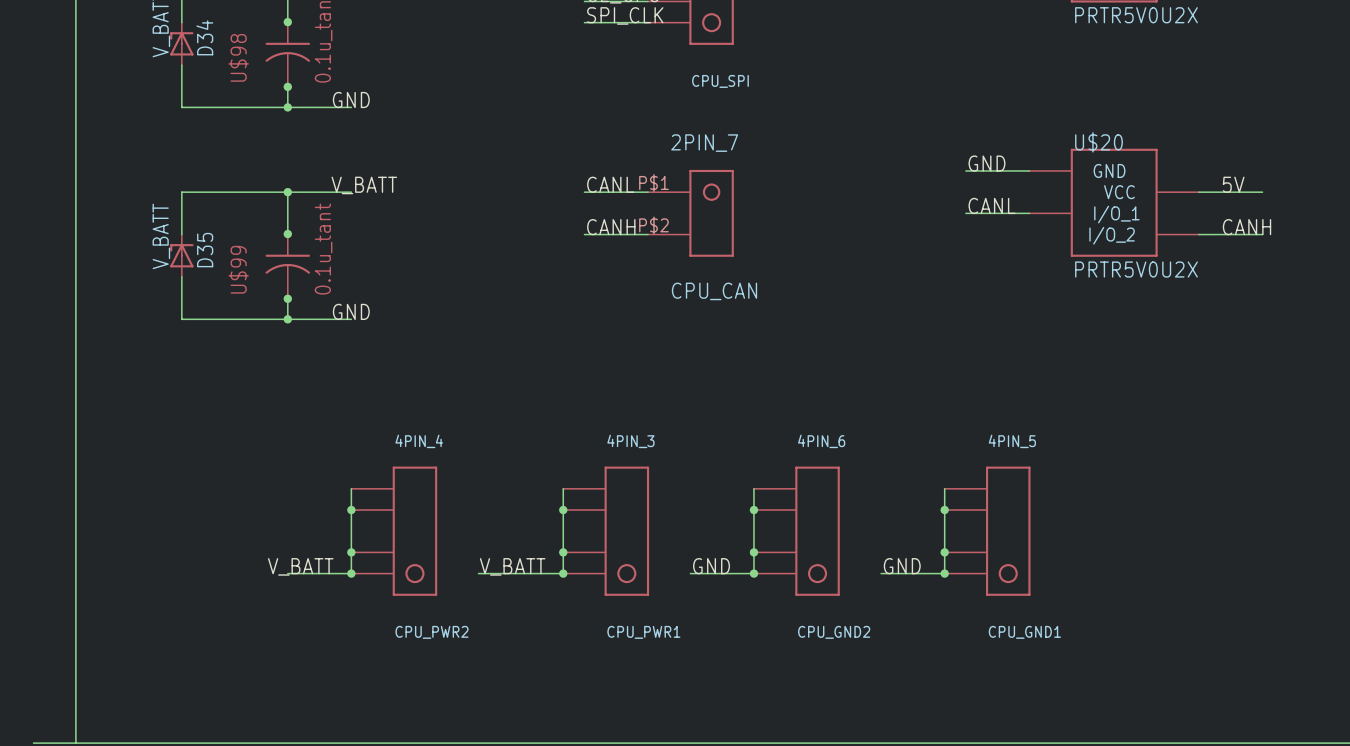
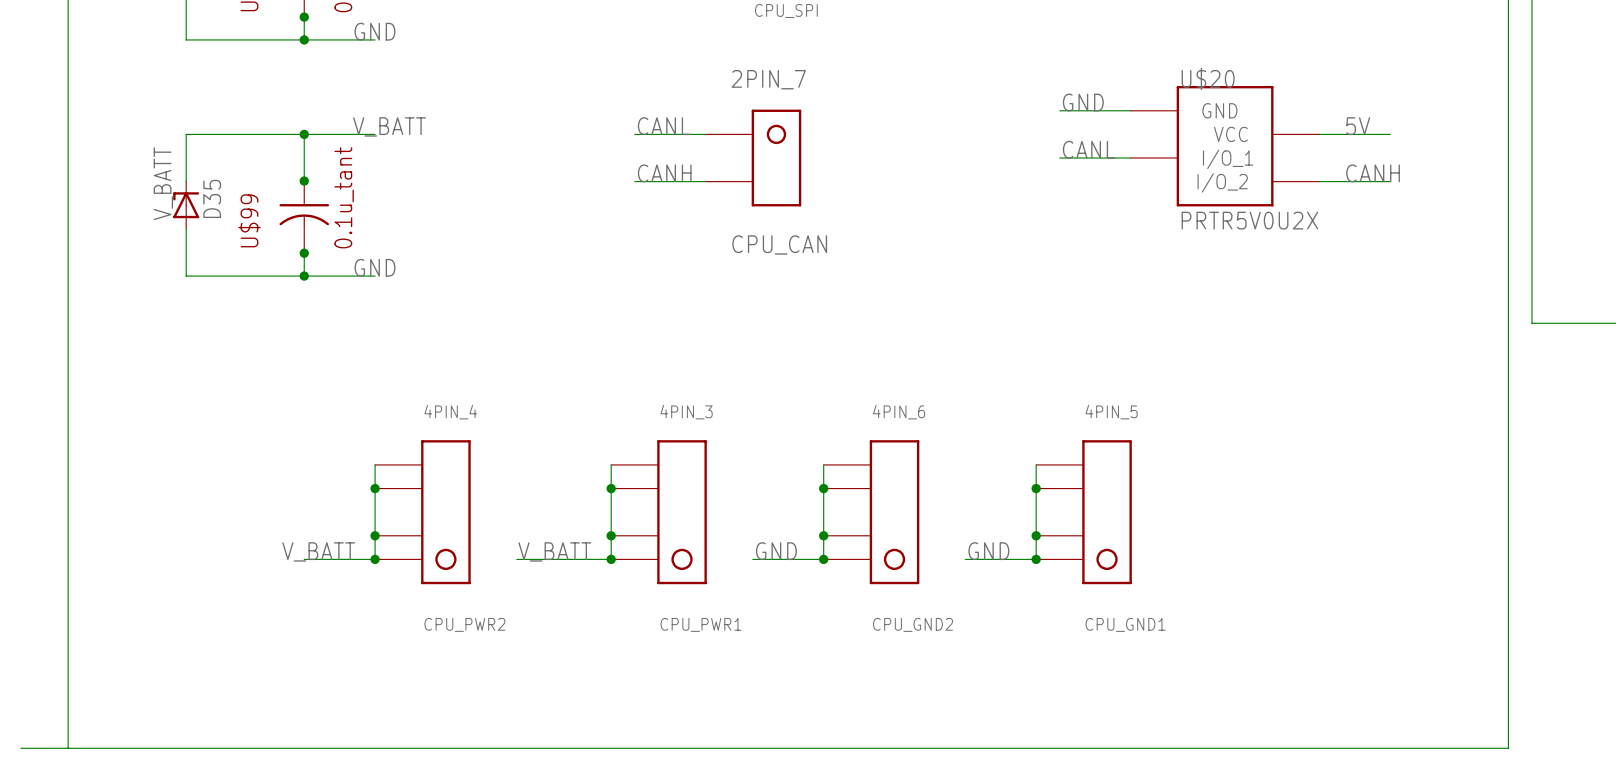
2PIN_7 pin number: P$1 (653, 182) -> none
2PIN_7 pin number: P$2 (653, 225) -> none

